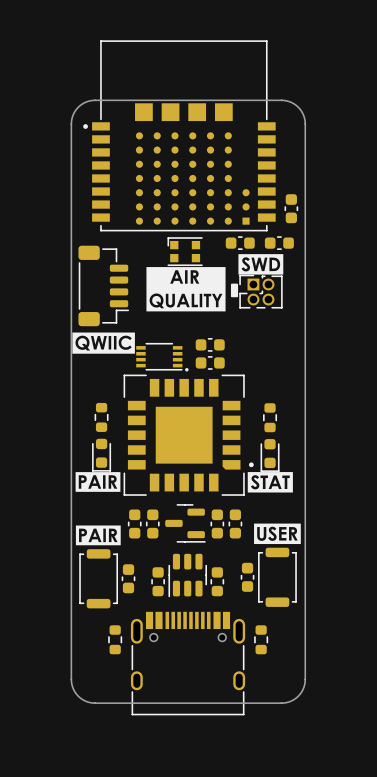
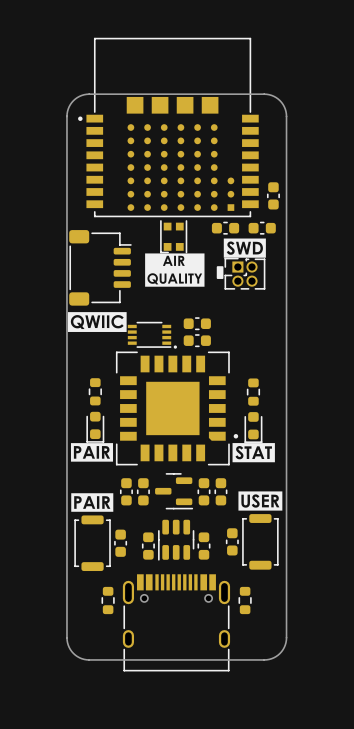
part footprint: [78, 245, 129, 327] -> [69, 230, 132, 306]
part rotation: 0° (185, 251) -> 90° counterclockwise (173, 236)
drawing shape: [146, 267, 226, 312] -> [145, 253, 205, 287]

